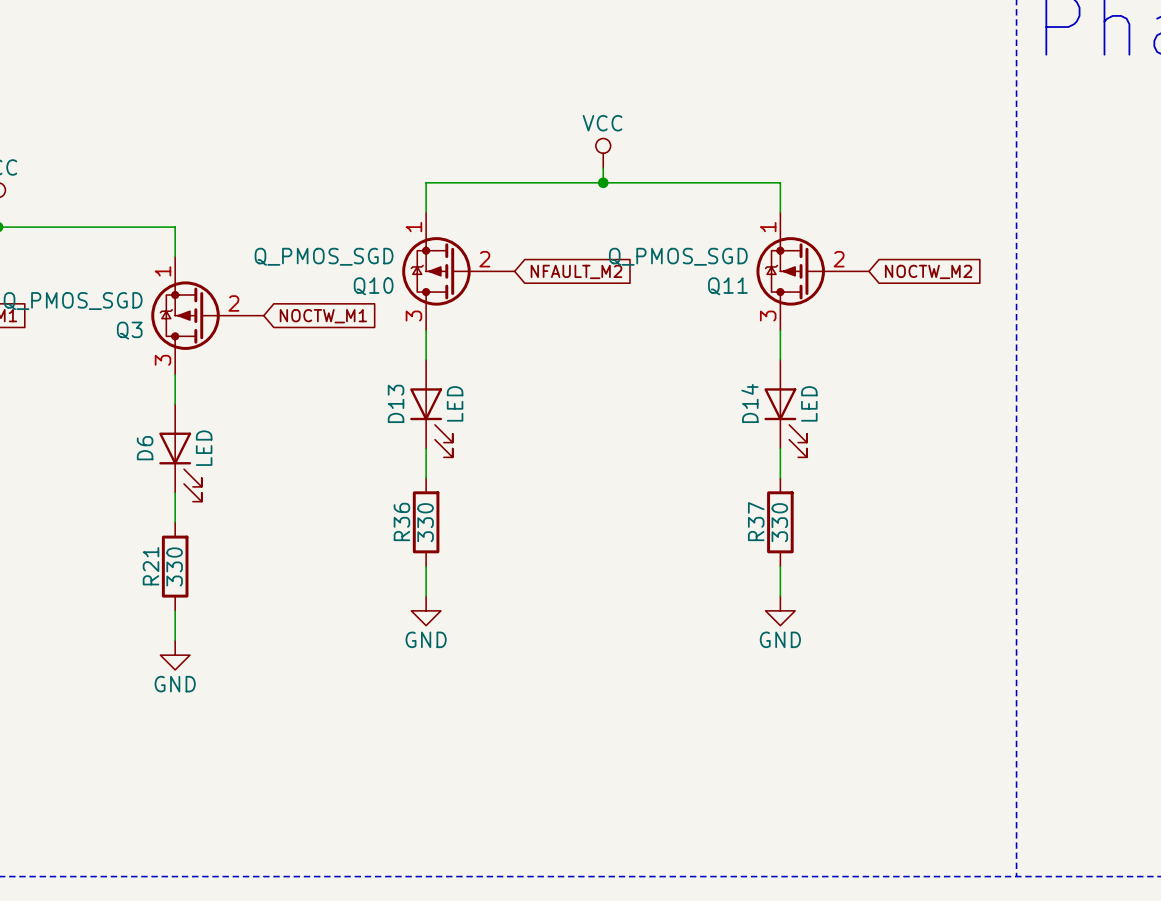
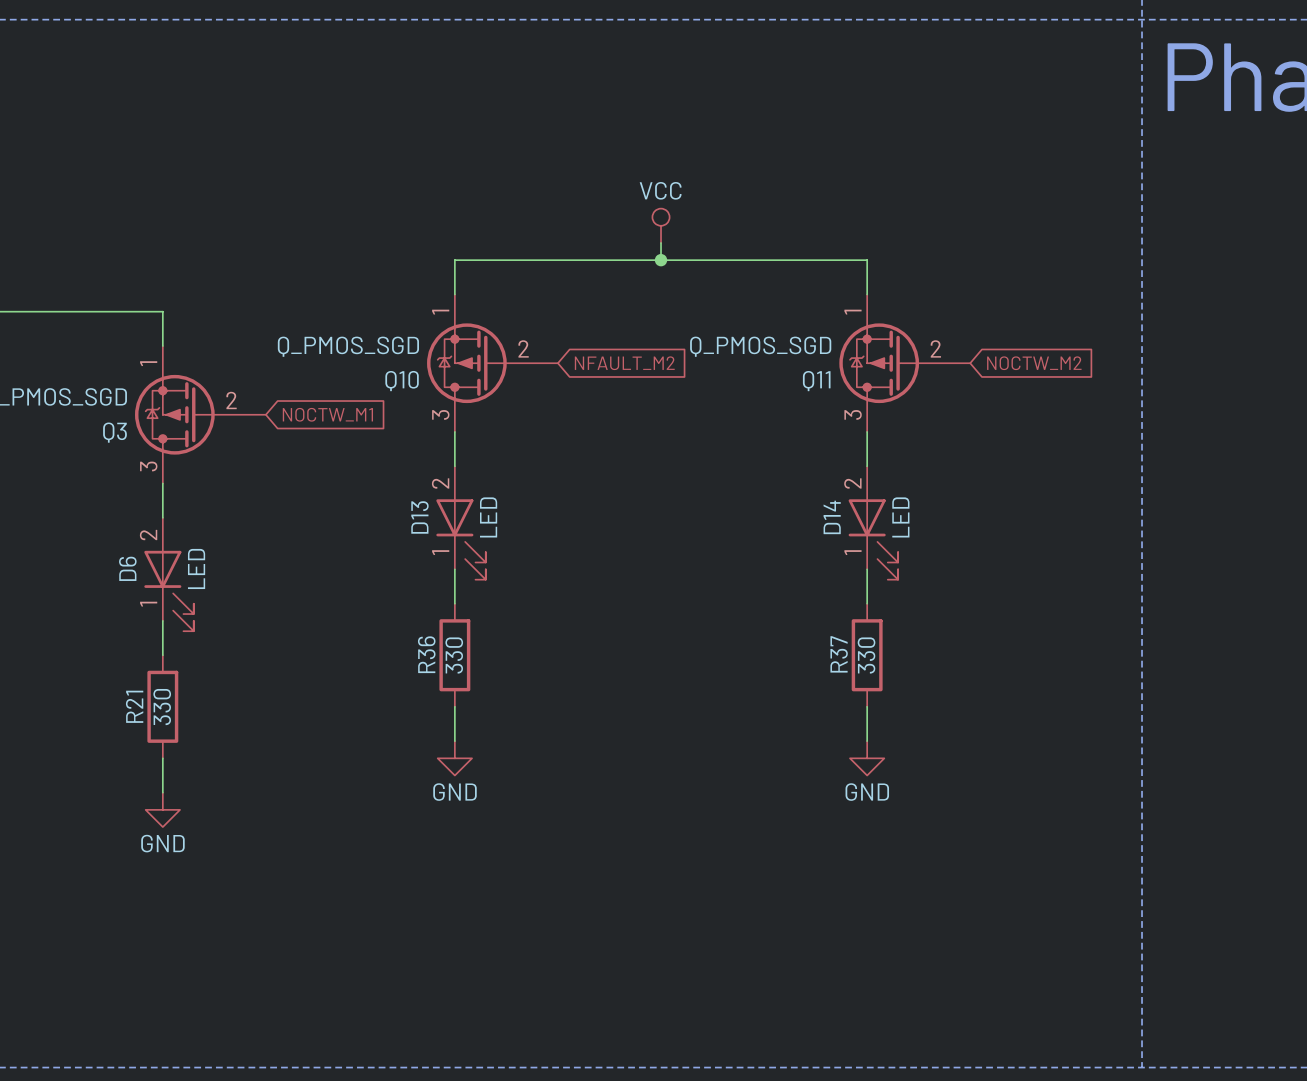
D13 pin number: none -> 2 (440, 483)
D14 pin number: none -> 2 (852, 483)
D6 pin number: none -> 2 (148, 535)
D13 pin number: none -> 1 (440, 552)
D14 pin number: none -> 1 (852, 552)
D6 pin number: none -> 1 (148, 604)

